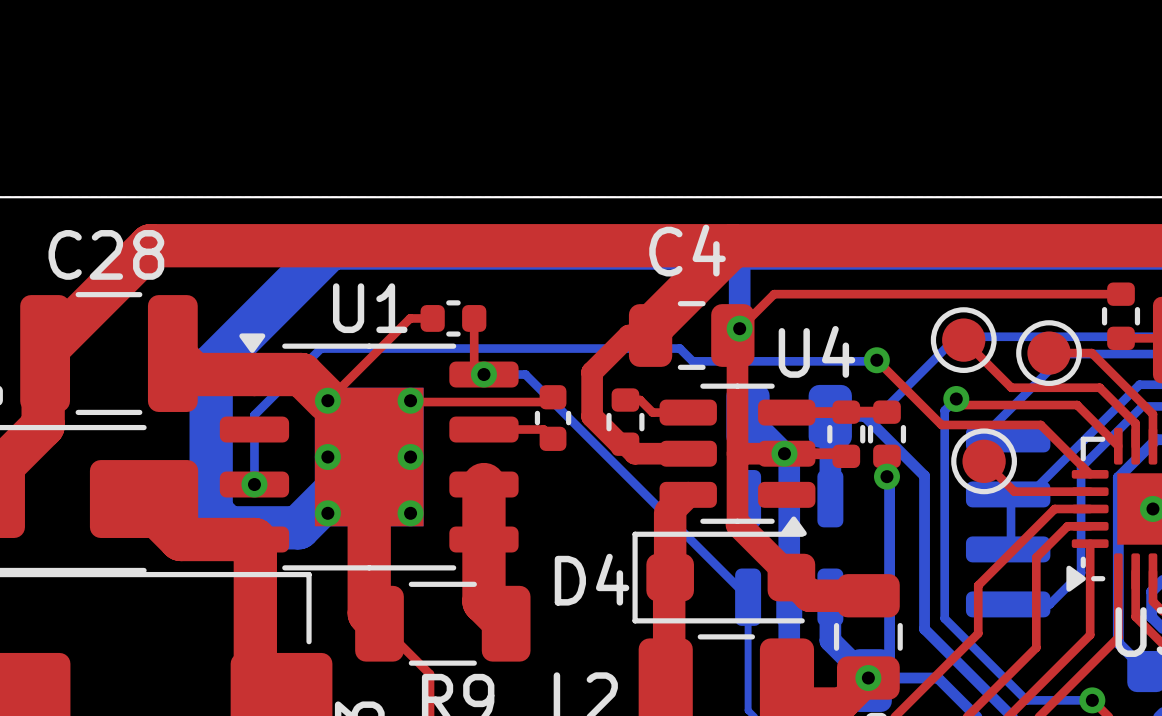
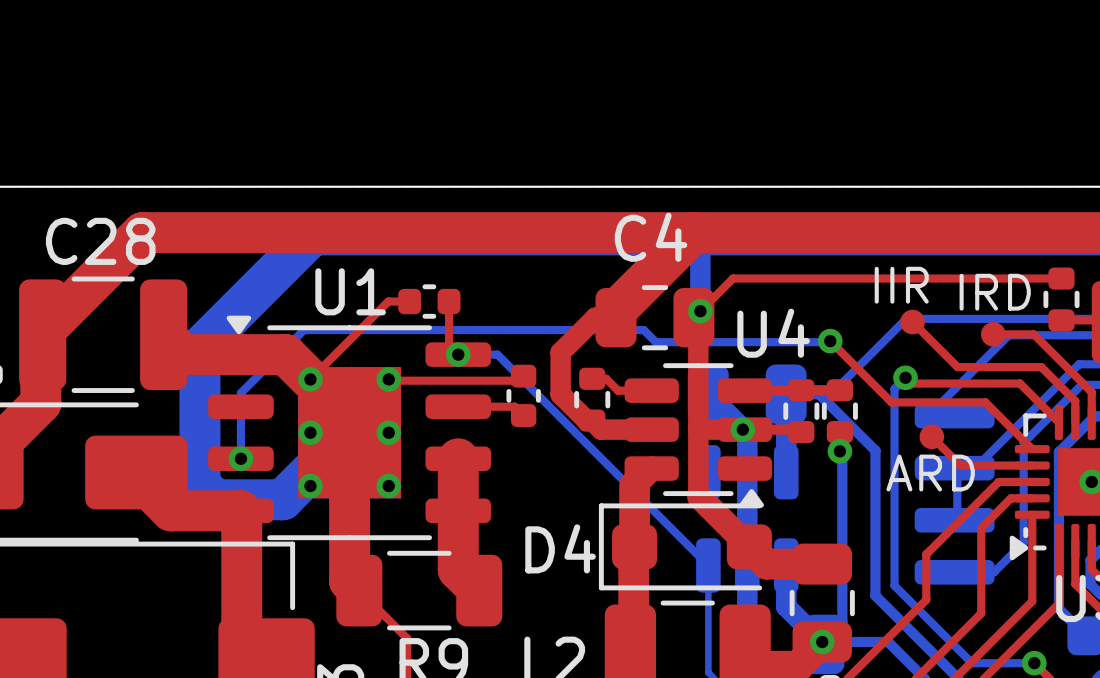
text: none -> IIR (901, 285)
part footprint: [930, 307, 997, 374] -> [900, 309, 925, 335]
text: none -> IRD (995, 292)
part footprint: [1016, 320, 1082, 387] -> [981, 322, 1006, 347]
part footprint: [951, 428, 1018, 495] -> [919, 424, 945, 450]
text: none -> ARD (930, 473)

